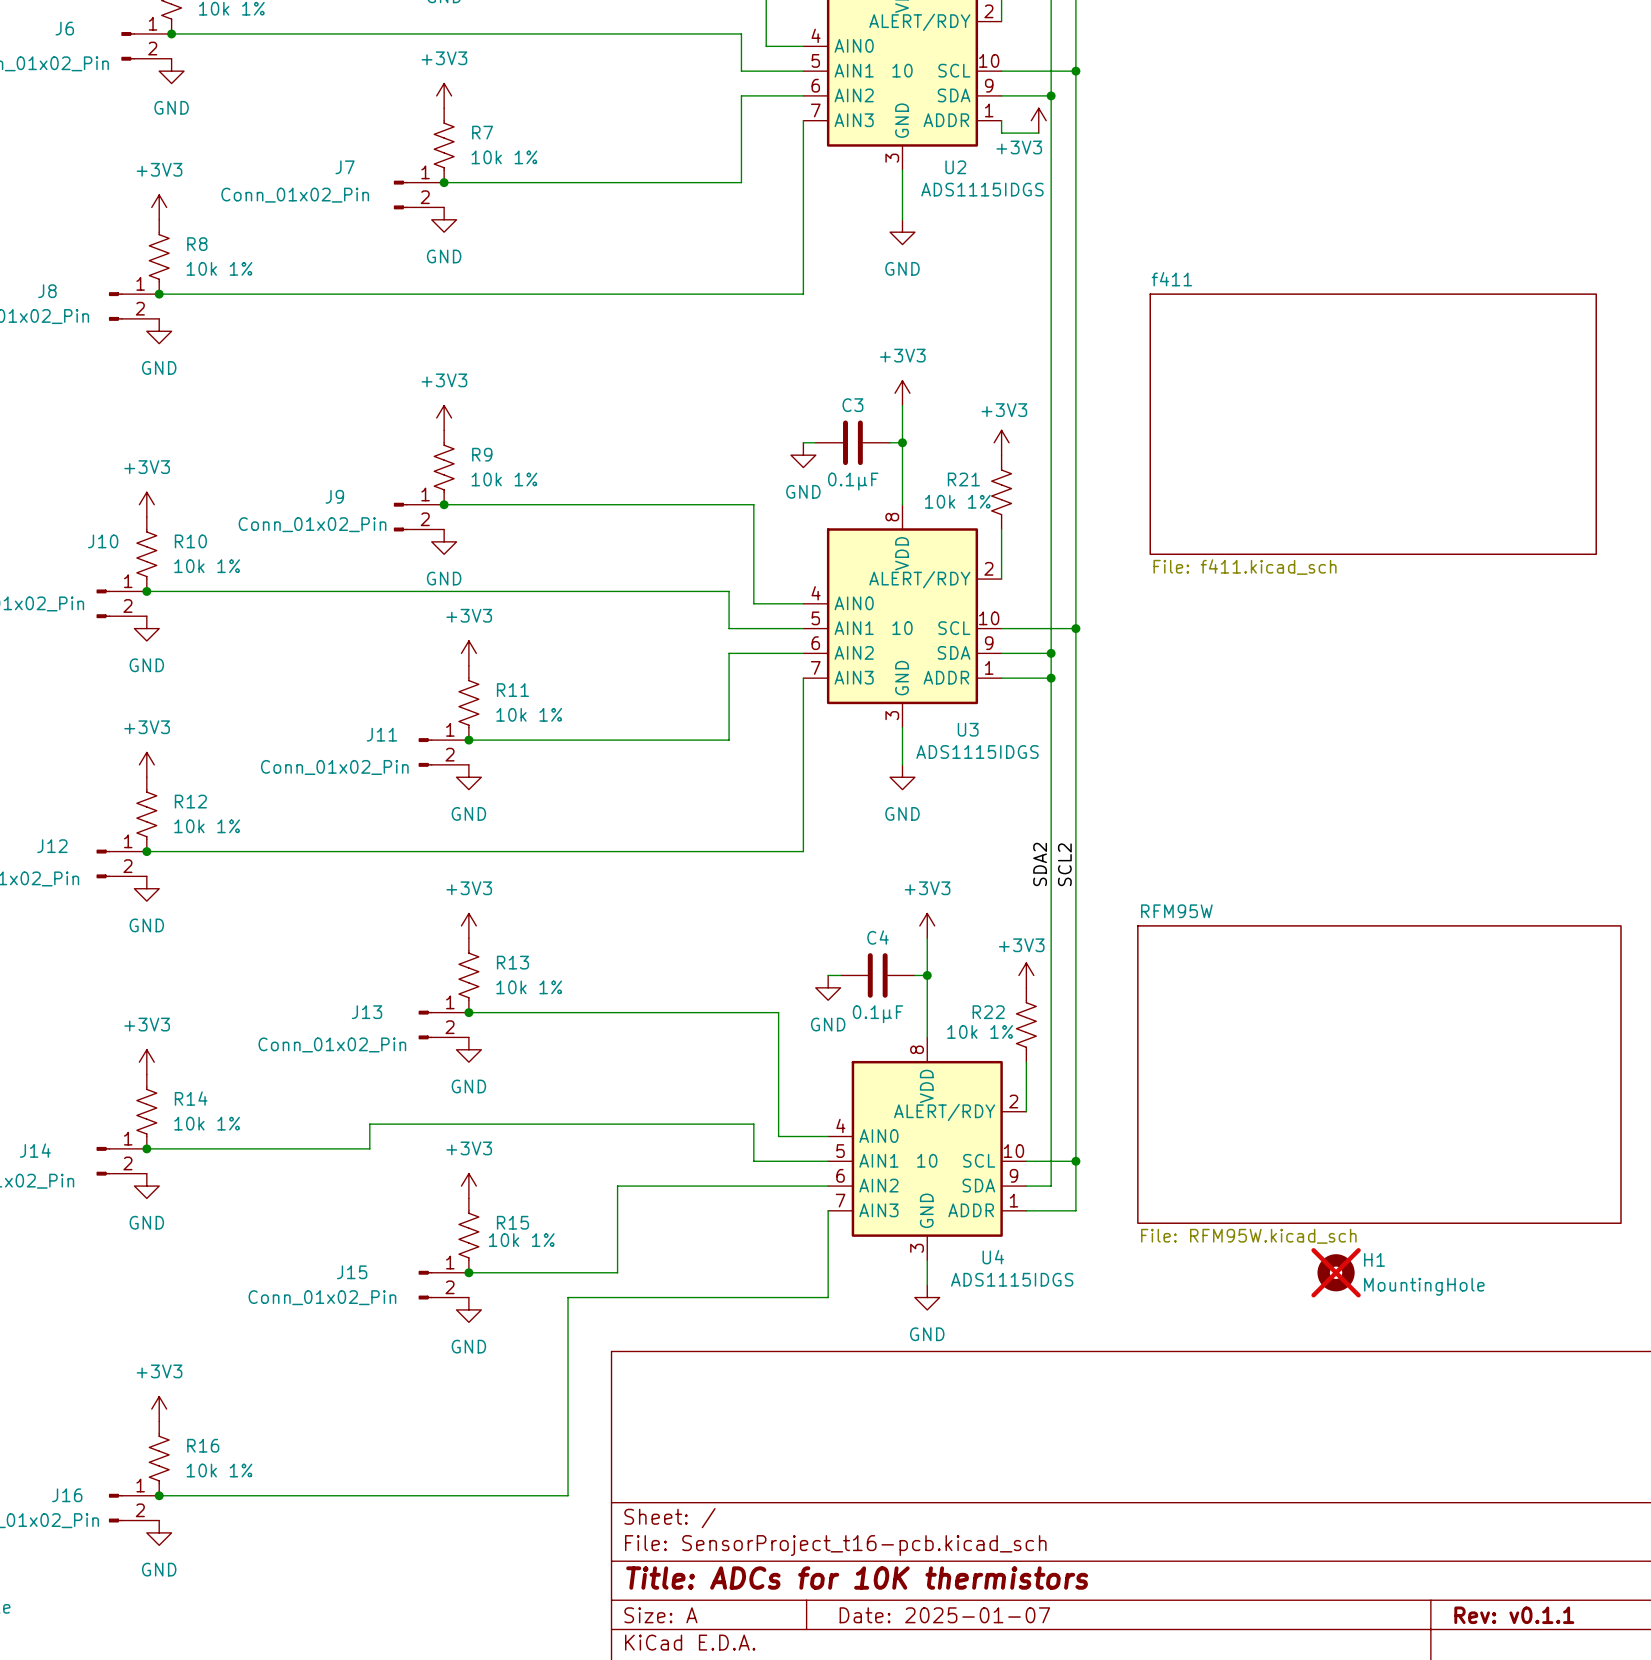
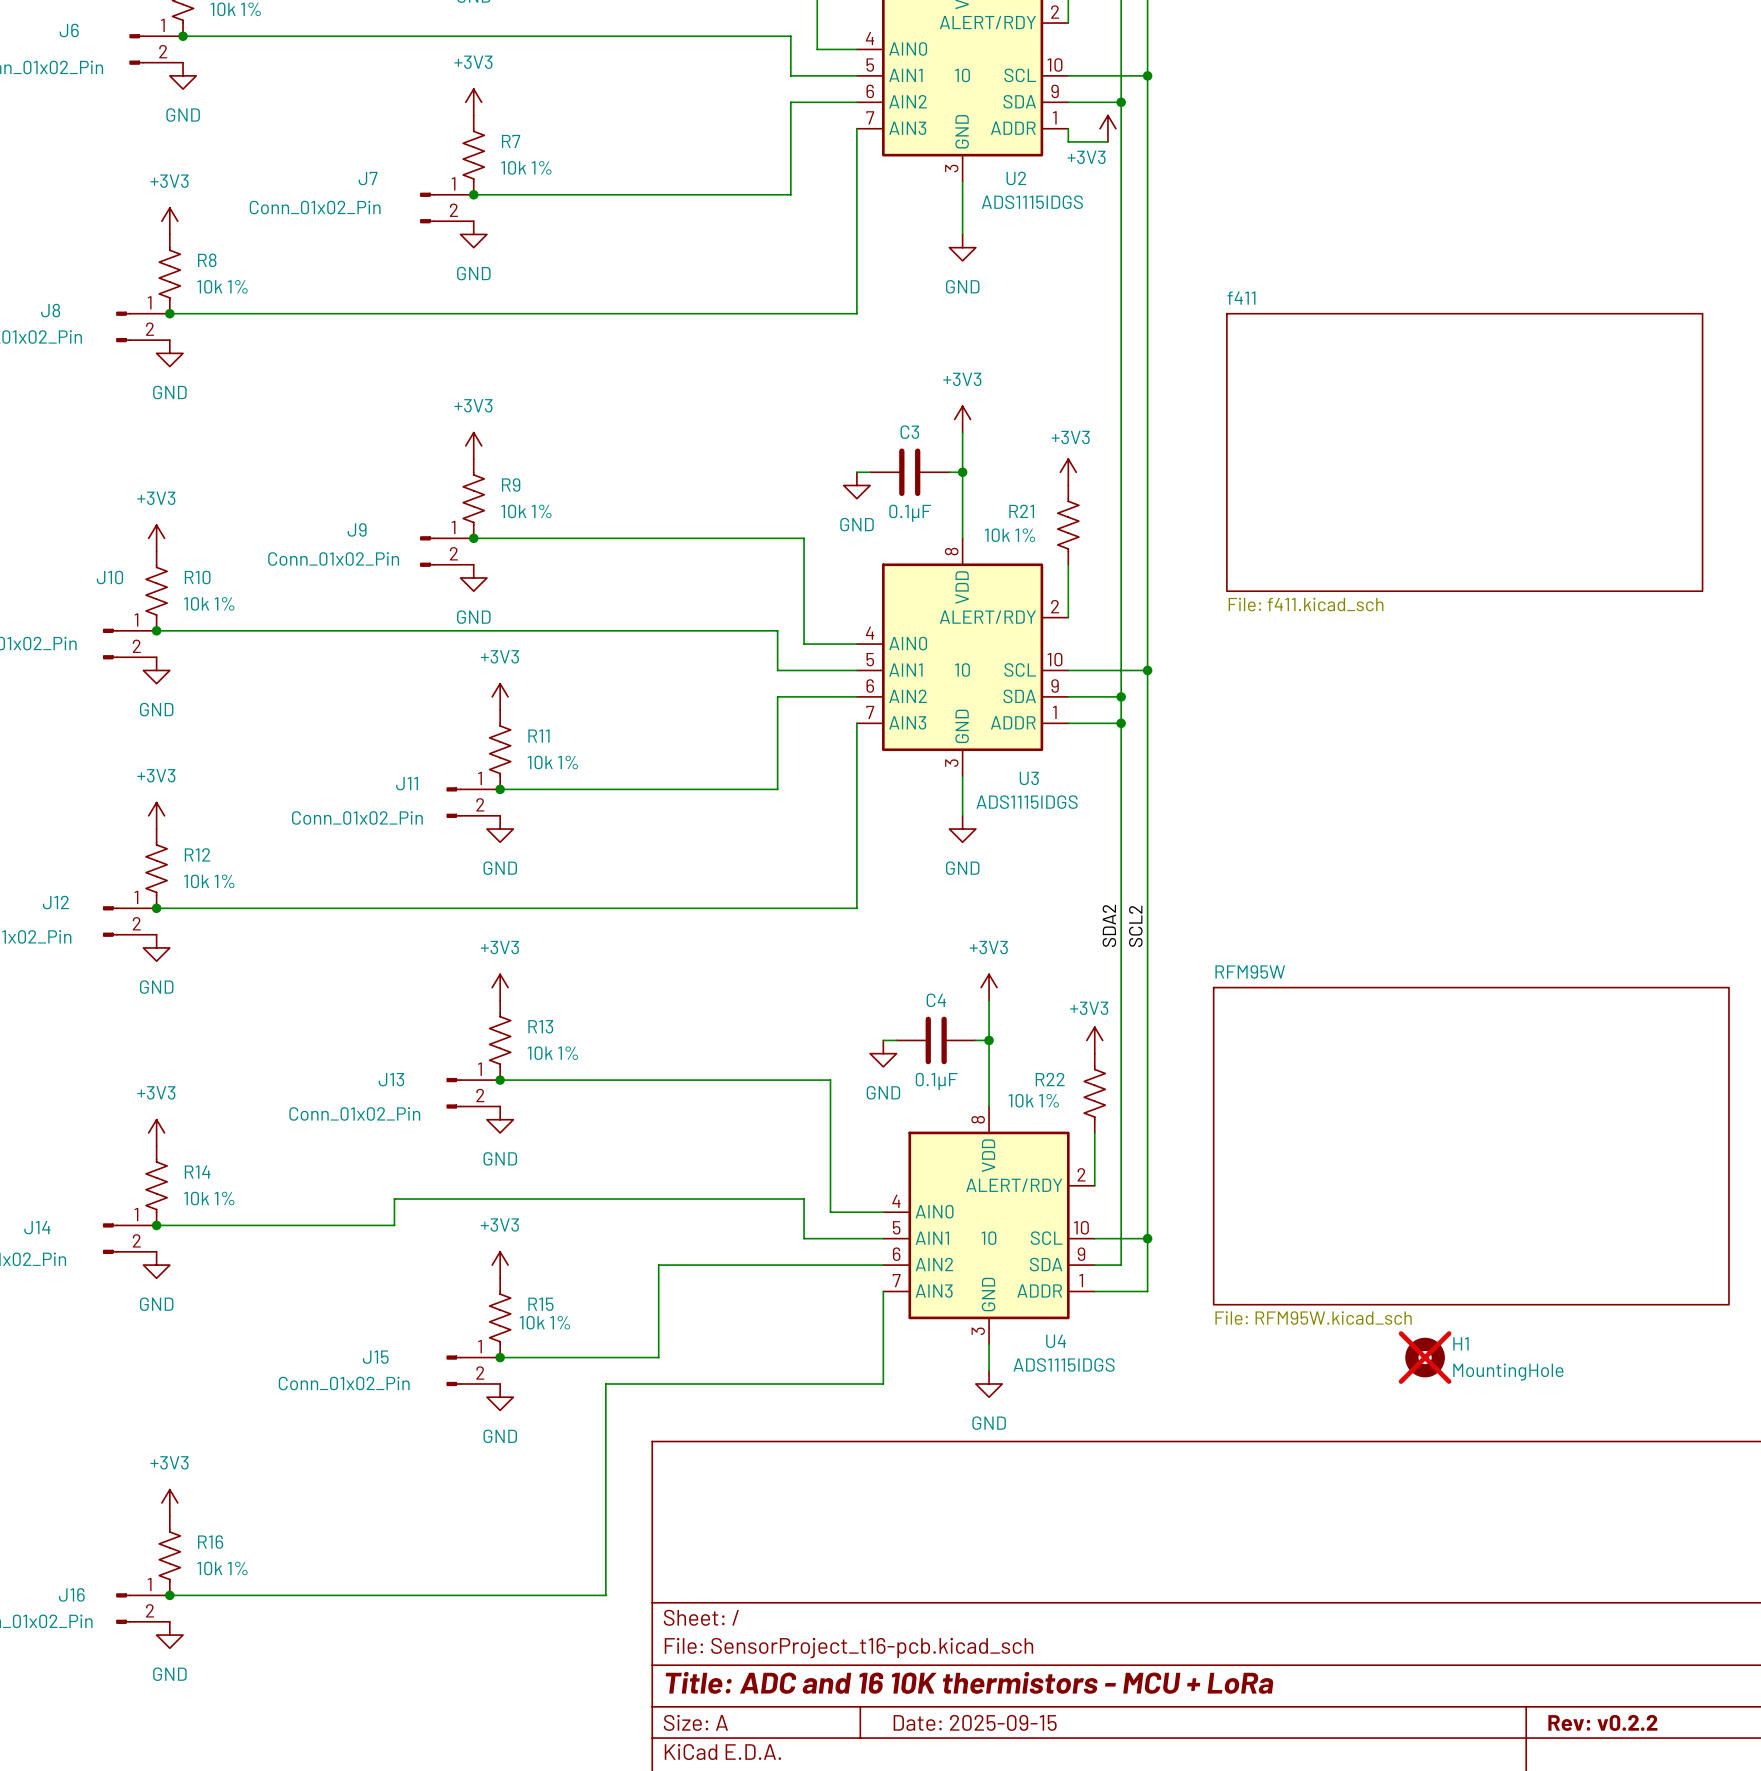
title block: Title: ADCs for 10K thermistors (857, 1578) -> Title: ADC and 16 10K thermistors - MCU + LoRa (969, 1682)
title block: Date: 2025-01-07 (944, 1615) -> Date: 2025-09-15 (975, 1722)
title block: Rev: v0.1.1 (1514, 1615) -> Rev: v0.2.2 (1602, 1722)

